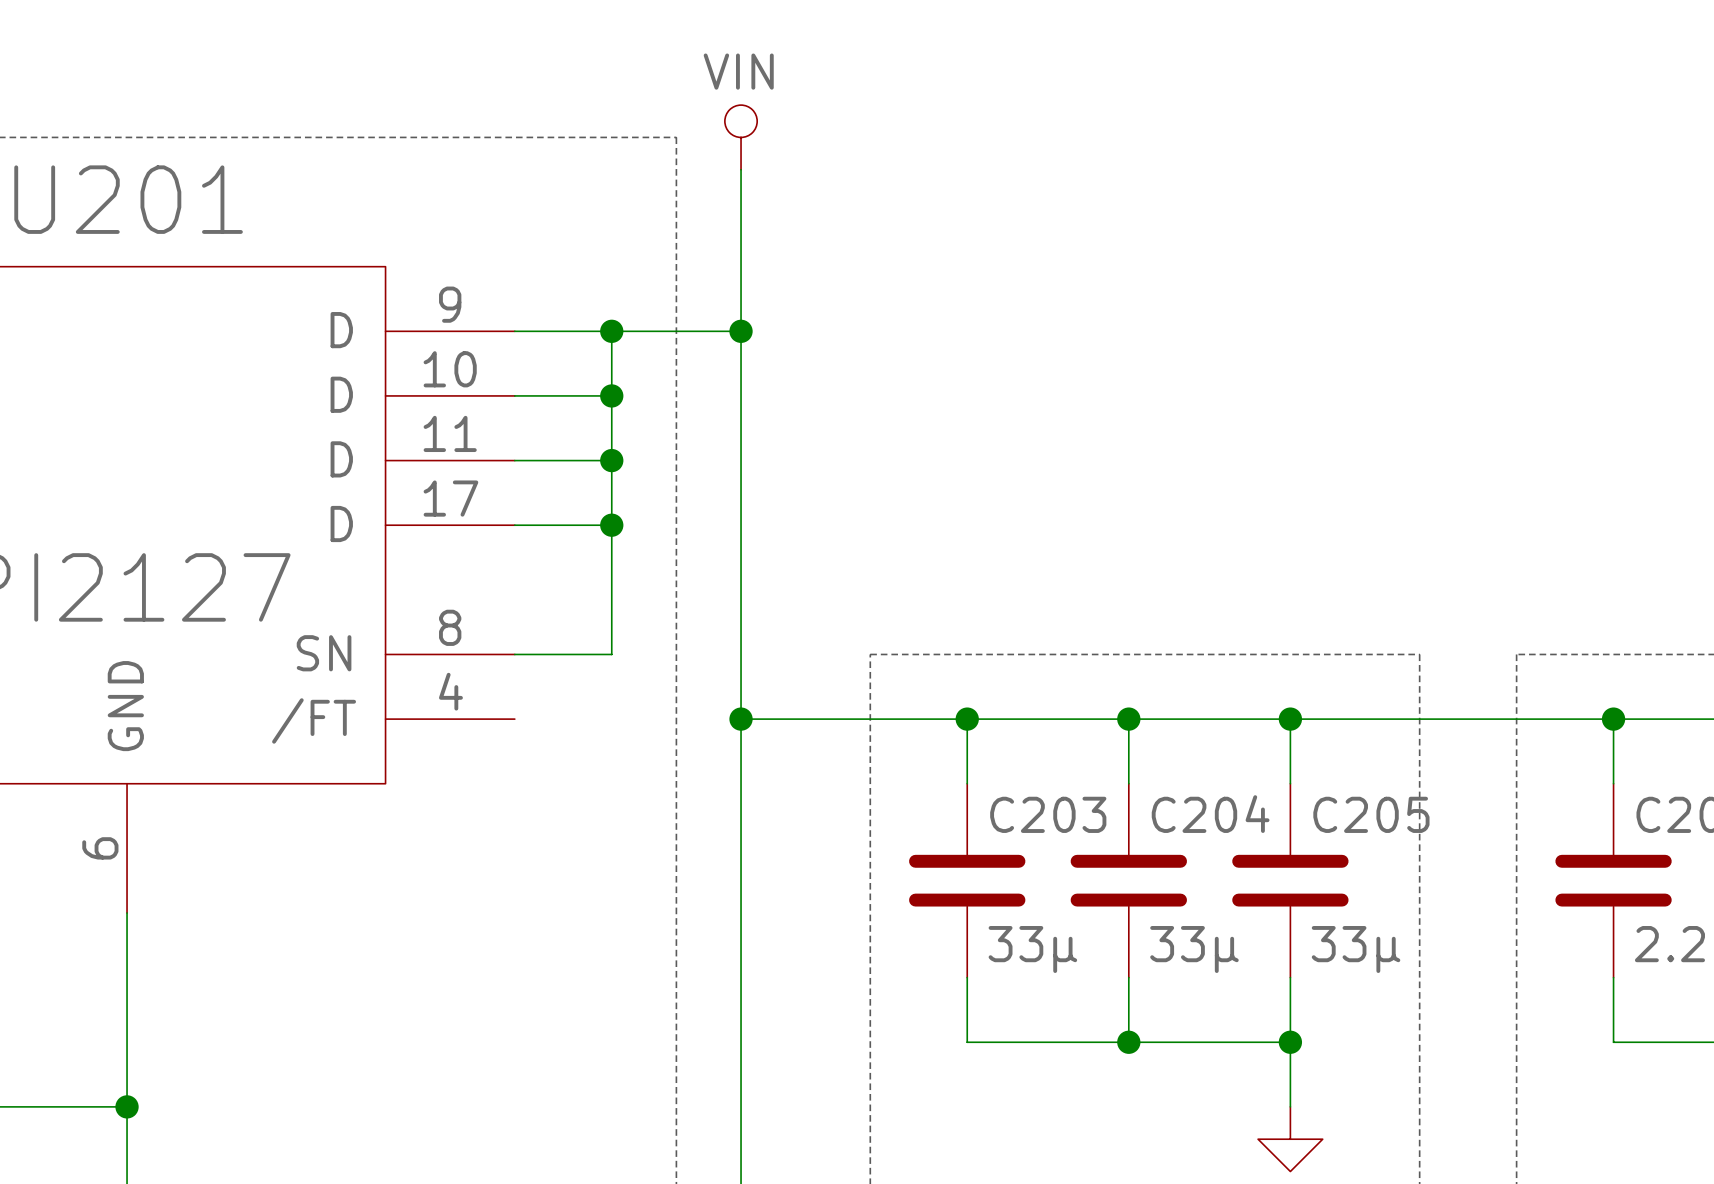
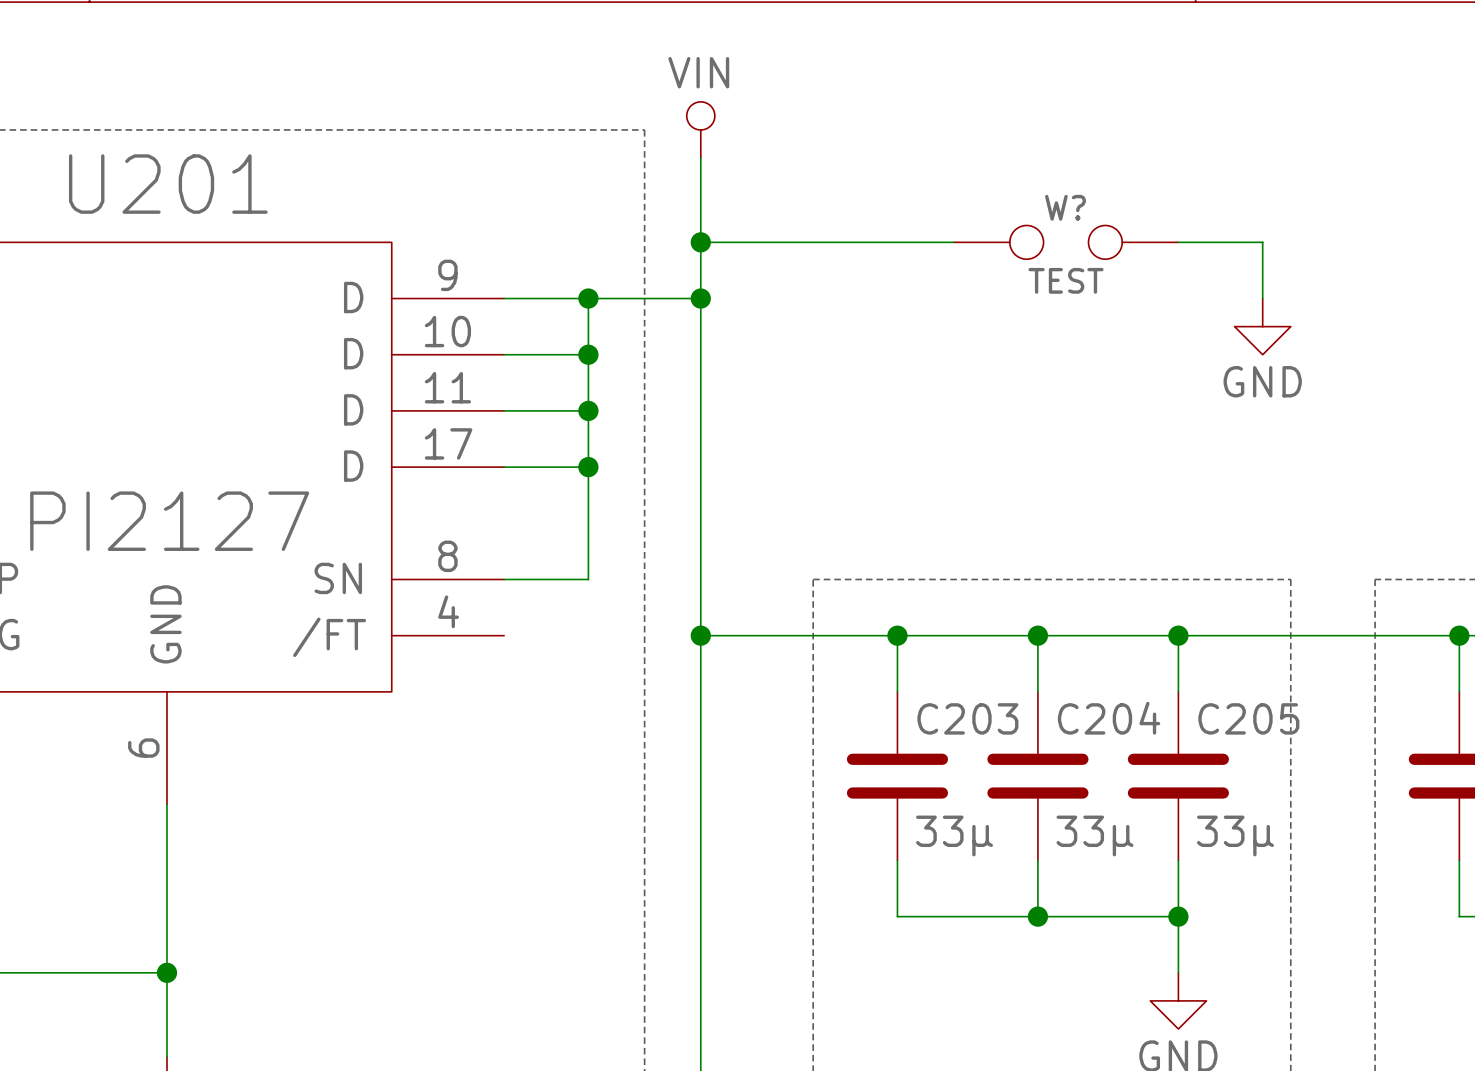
wire: none -> (700, 242) (953, 242)
junction: none -> (700, 242)
W?: none -> TEST (1066, 242)
wire: none -> (1178, 242) (1262, 242) (1262, 298)
power symbol: none -> GND (1262, 326)

